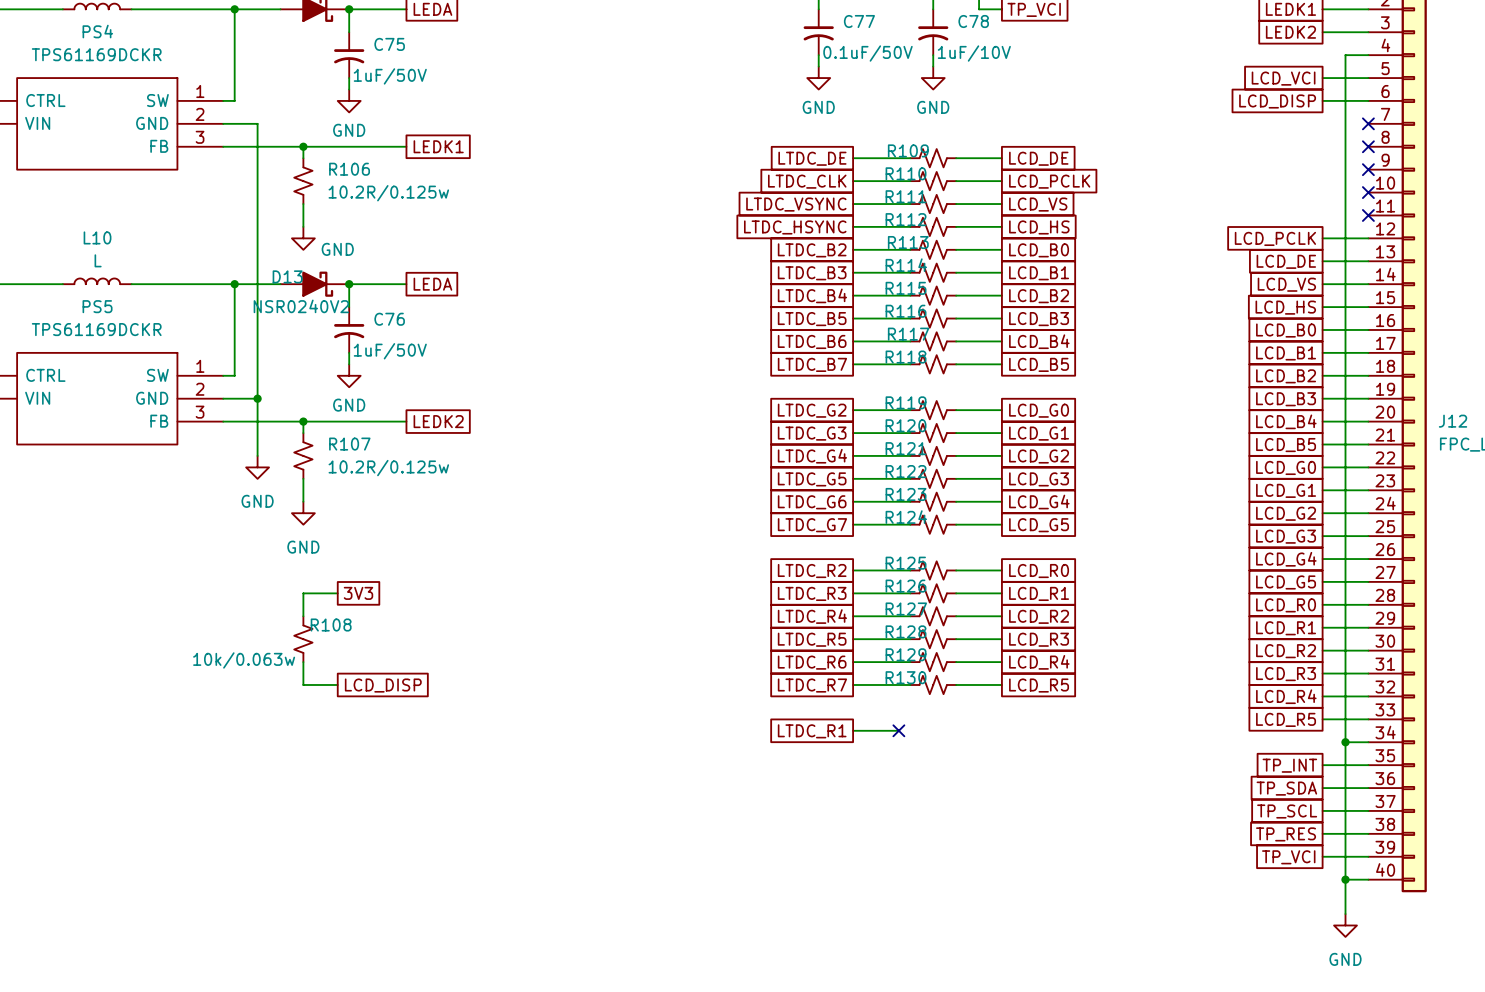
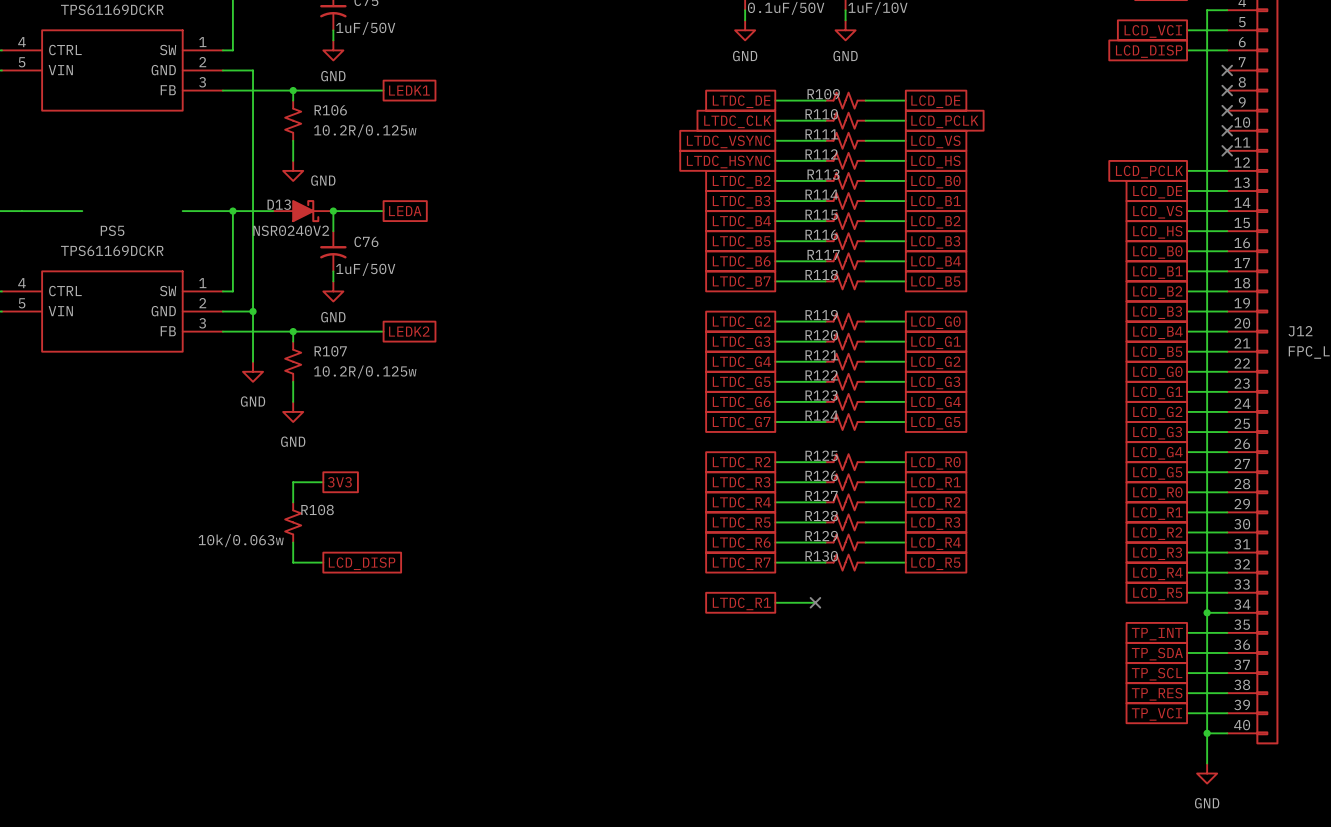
L10: L (97, 281) -> none
wire: (131, 284) (177, 284) -> none

